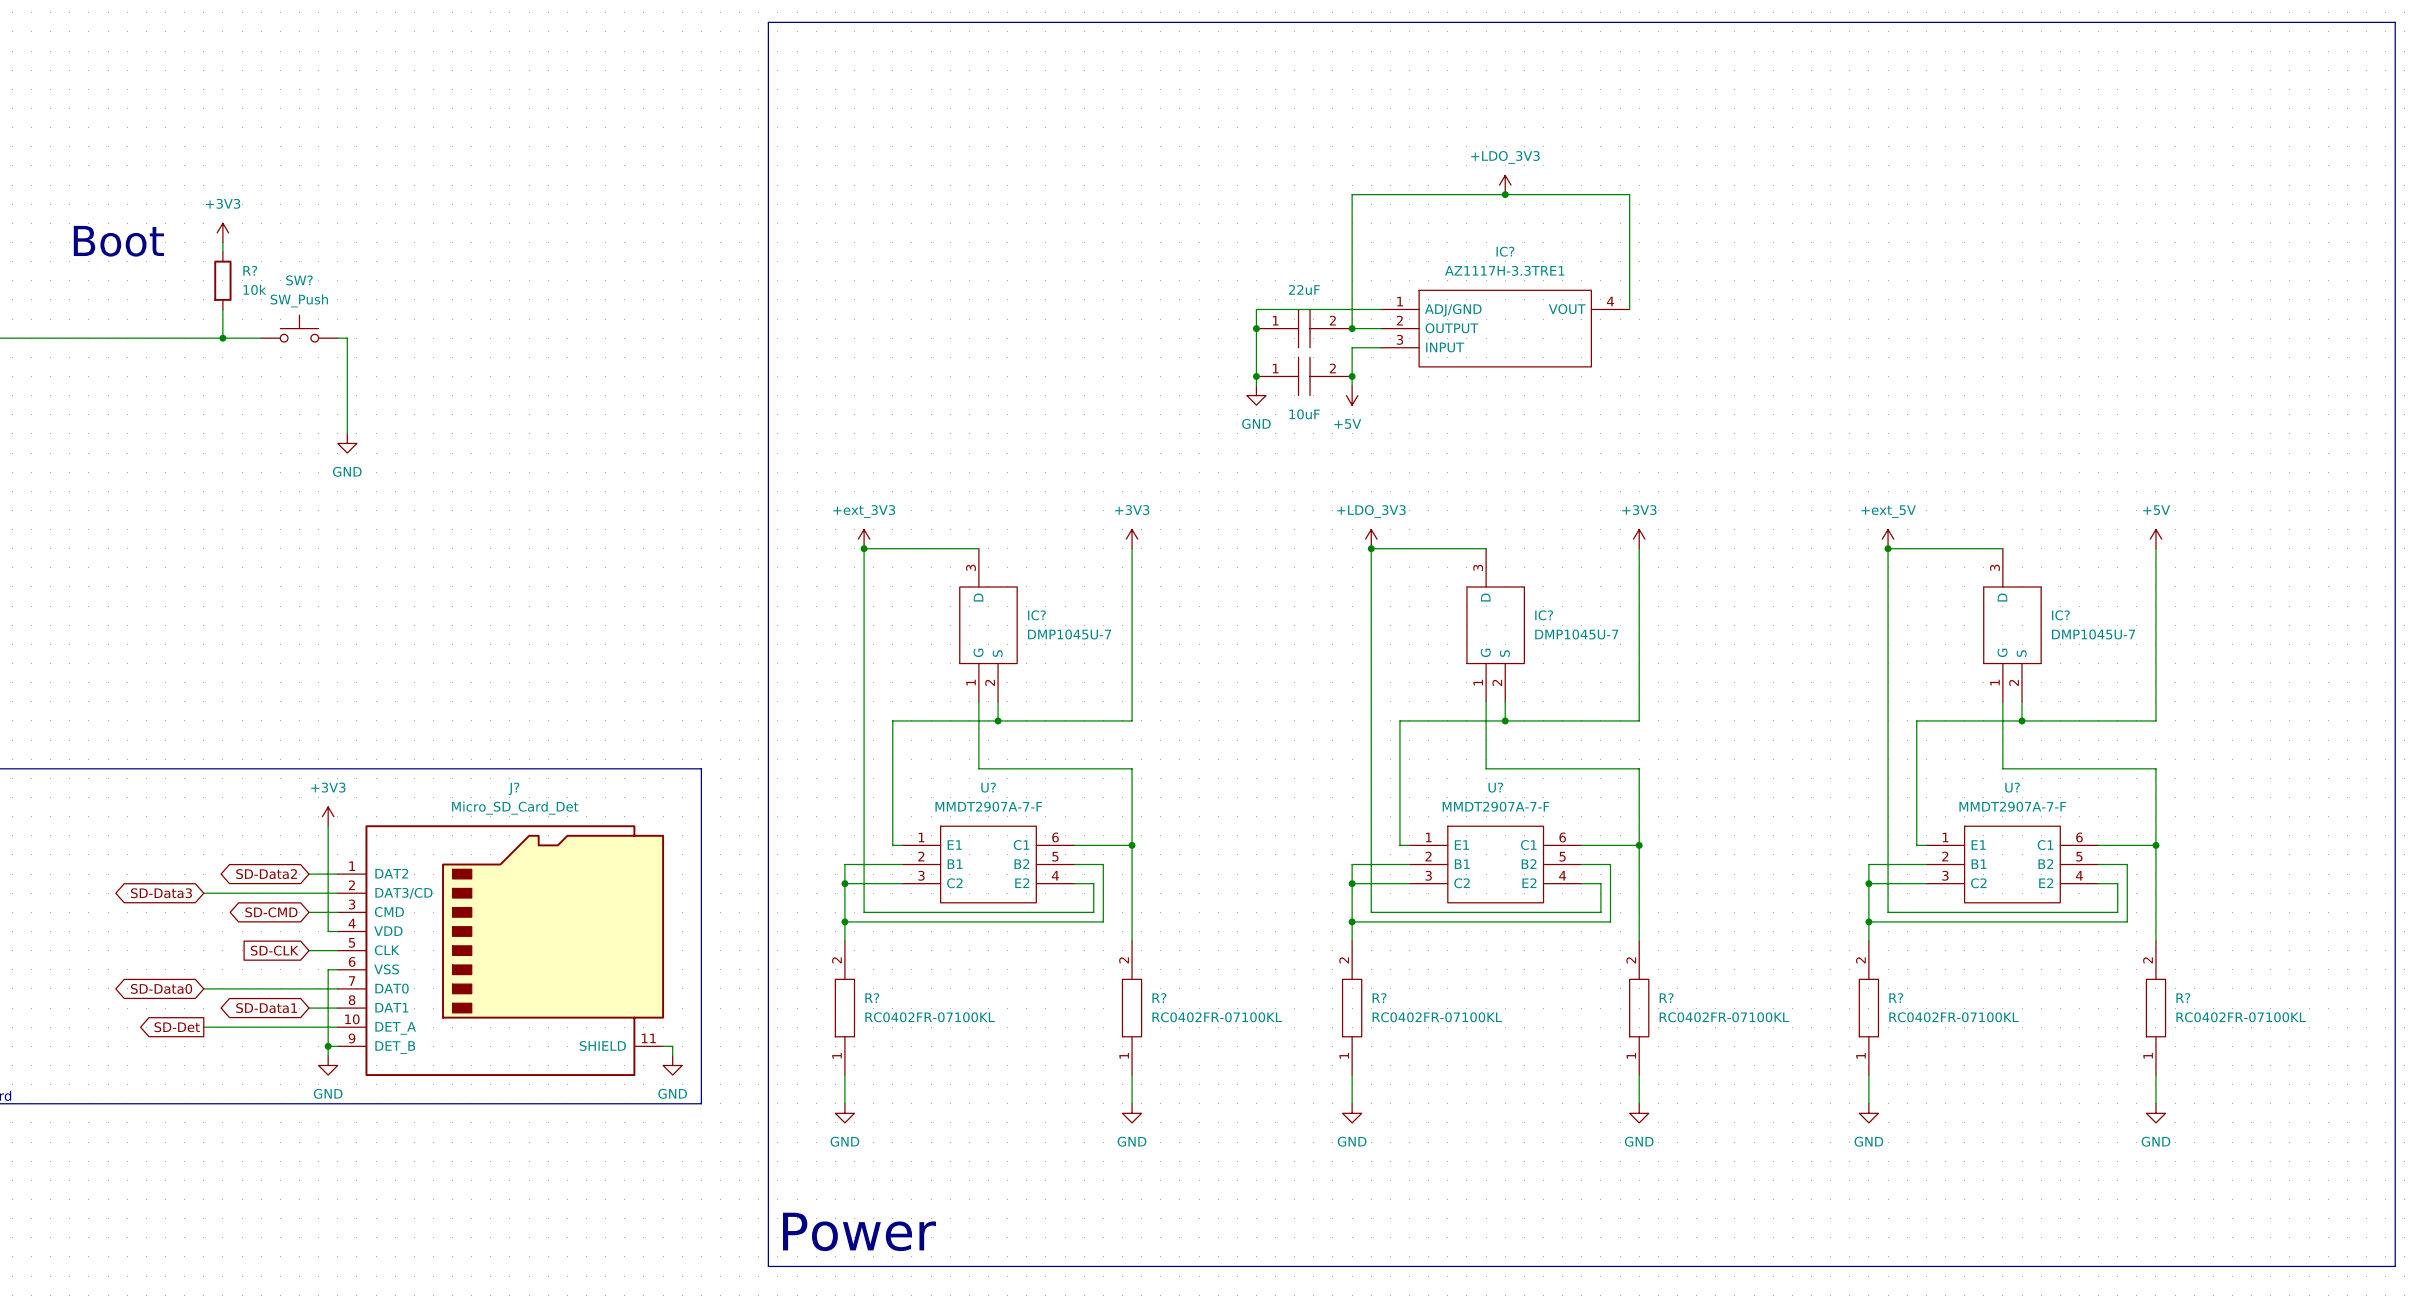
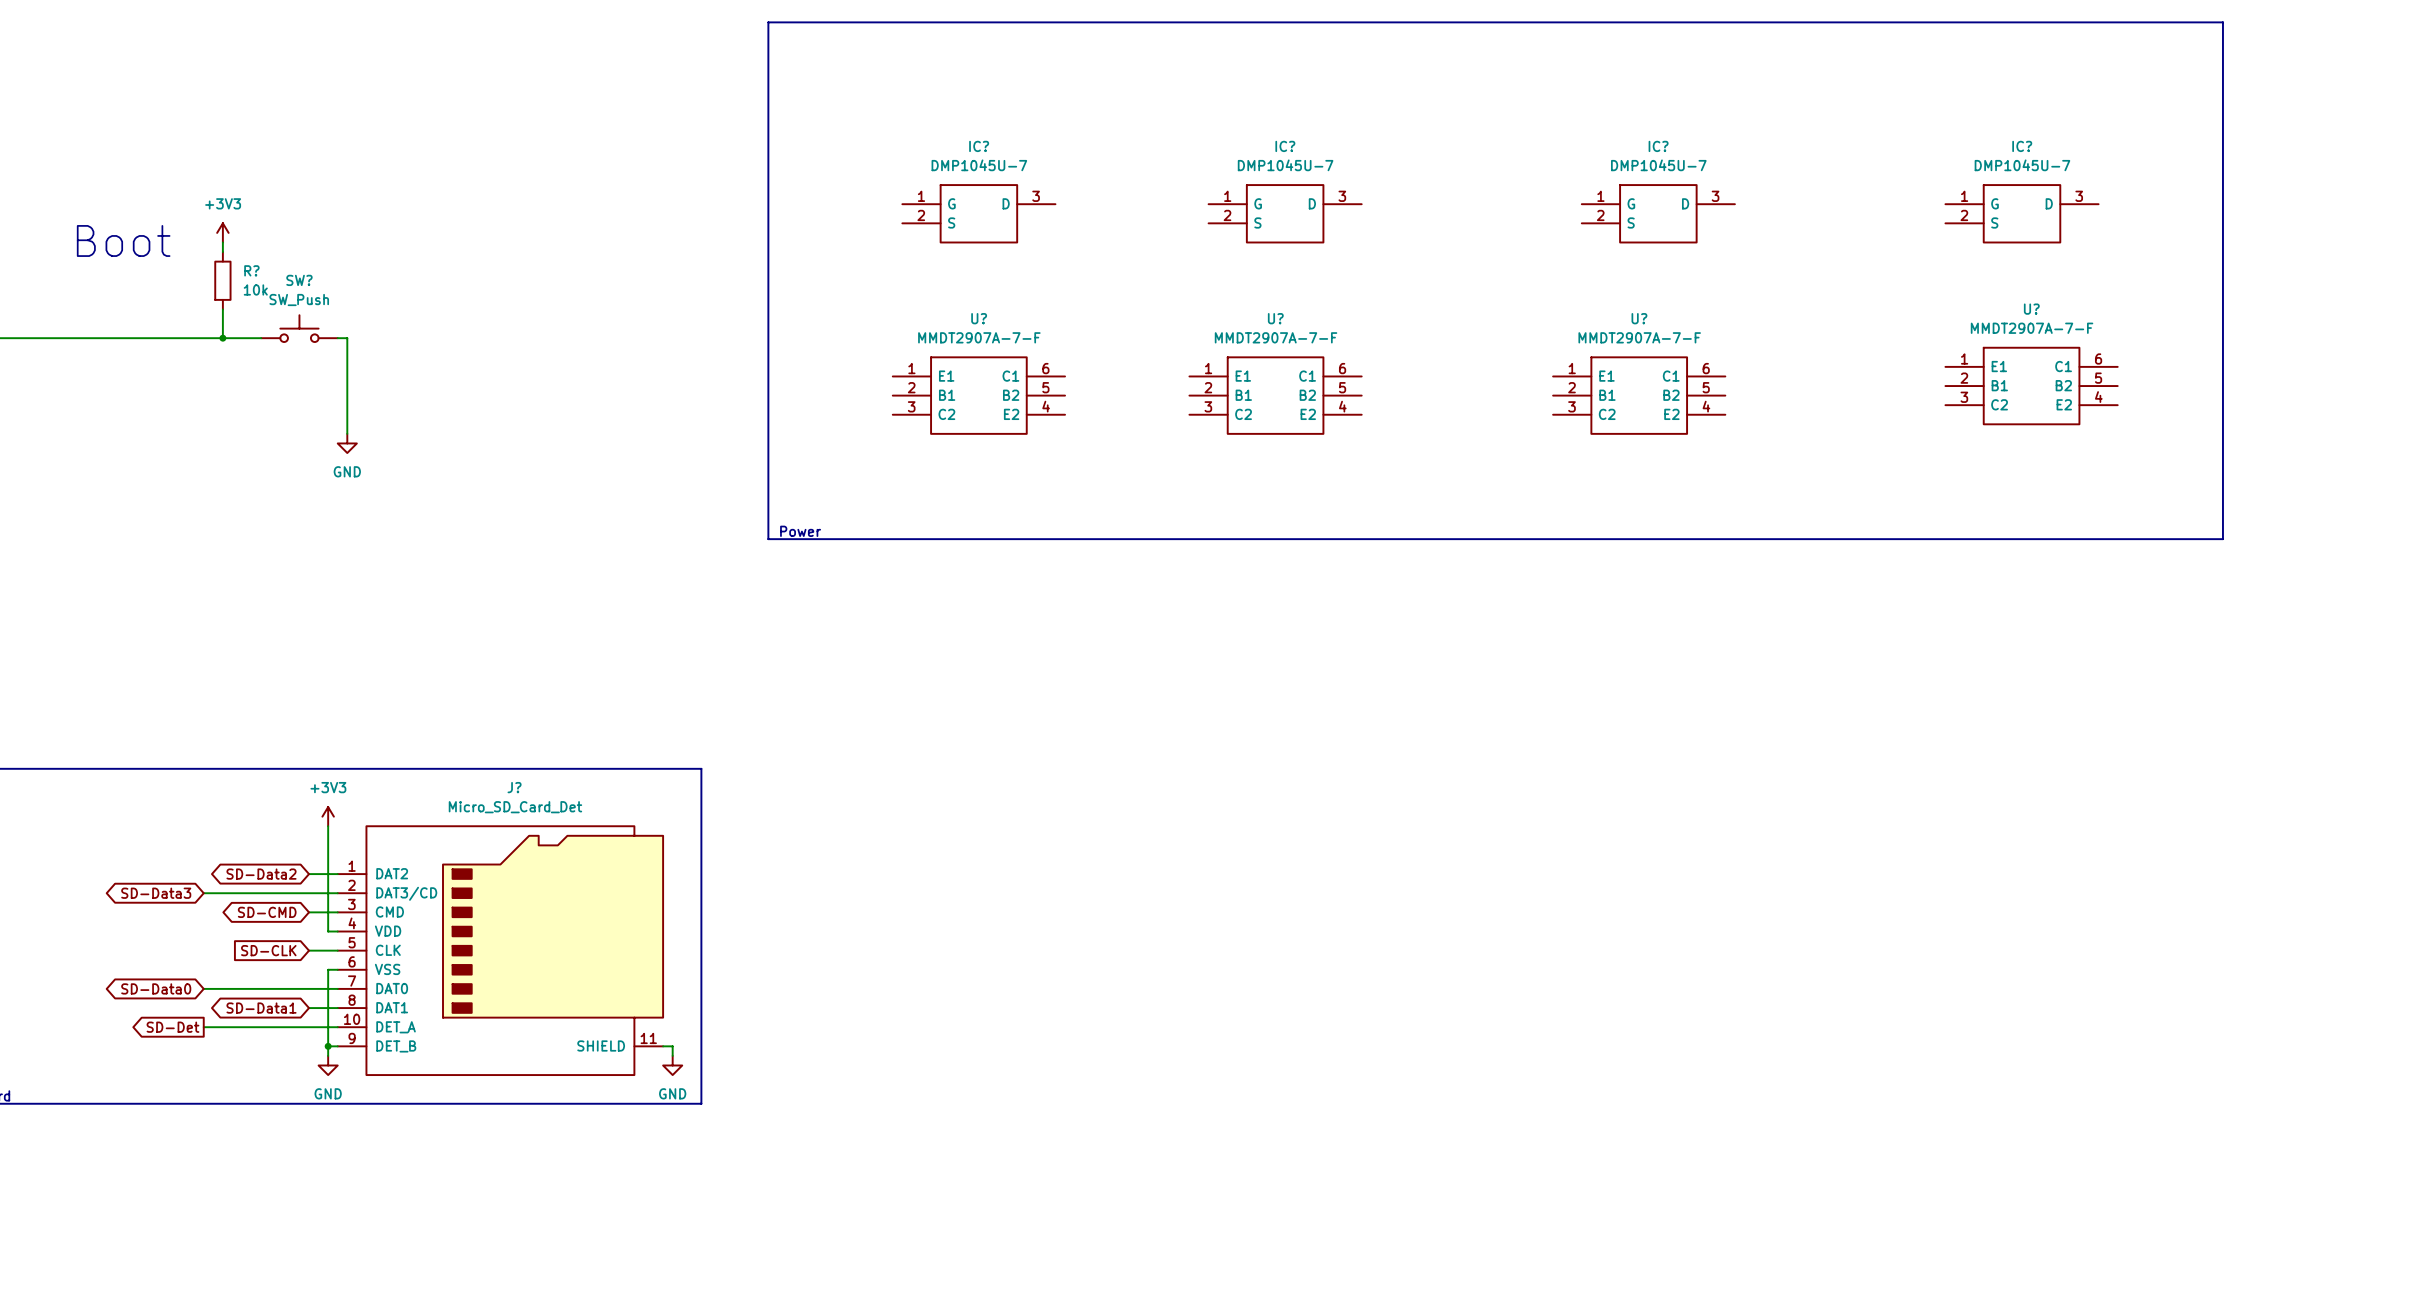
line: (2222, 22) (2395, 22) (2395, 1266) (768, 1266) (768, 539) -> (2222, 22) (2222, 539) (768, 539)
power symbol: +LDO_3V3 (1505, 185) -> none
junction: (1505, 194) -> none
IC?: none -> DMP1045U-7 (978, 213)
IC?: none -> DMP1045U-7 (1285, 213)
IC?: none -> DMP1045U-7 (1658, 213)
IC?: none -> DMP1045U-7 (2022, 213)
wire: (1380, 309) (1256, 309) (1256, 386) -> none
wire: (1629, 309) (1629, 194) (1352, 194) (1352, 328) (1380, 328) -> none
junction: (1256, 328) -> none
part: 22uF (1304, 328) -> none
junction: (1352, 328) -> none
IC?: AZ1117H-3.3TRE1 (1505, 328) -> none
wire: (1380, 347) (1352, 347) (1352, 386) -> none
junction: (1256, 376) -> none
part: 10uF (1304, 376) -> none
junction: (1352, 376) -> none
U?: none -> MMDT2907A-7-F (2031, 386)
U?: none -> MMDT2907A-7-F (978, 395)
power symbol: GND (1256, 395) -> none
U?: none -> MMDT2907A-7-F (1275, 395)
power symbol: +5V (1352, 395) -> none
U?: none -> MMDT2907A-7-F (1639, 395)
text: none -> Power (800, 531)
power symbol: +ext_3V3 (864, 539) -> none
power symbol: +3V3 (1132, 539) -> none
power symbol: +LDO_3V3 (1371, 539) -> none
power symbol: +3V3 (1639, 539) -> none
power symbol: +ext_5V (1888, 539) -> none
power symbol: +5V (2155, 539) -> none
junction: (864, 548) -> none
wire: (978, 548) (864, 548) (864, 912) (1093, 912) (1093, 883) (1074, 883) -> none
wire: (1132, 548) (1132, 720) (892, 720) (892, 845) (902, 845) -> none
junction: (1371, 548) -> none
wire: (1486, 548) (1371, 548) (1371, 912) (1600, 912) (1600, 883) (1581, 883) -> none
wire: (1639, 548) (1639, 720) (1399, 720) (1399, 845) (1409, 845) -> none
junction: (1888, 548) -> none
wire: (2002, 548) (1888, 548) (1888, 912) (2117, 912) (2117, 883) (2098, 883) -> none
wire: (2155, 548) (2155, 720) (1916, 720) (1916, 845) (1926, 845) -> none
IC?: DMP1045U-7 (988, 625) -> none
IC?: DMP1045U-7 (1495, 625) -> none
IC?: DMP1045U-7 (2012, 625) -> none
wire: (978, 701) (978, 768) (1132, 768) (1132, 941) -> none
wire: (998, 701) (998, 720) -> none
wire: (1486, 701) (1486, 768) (1639, 768) (1639, 941) -> none
wire: (1505, 701) (1505, 720) -> none
wire: (2002, 701) (2002, 768) (2155, 768) (2155, 941) -> none
wire: (2022, 701) (2022, 720) -> none
junction: (998, 720) -> none
junction: (1505, 720) -> none
junction: (2022, 720) -> none
wire: (1074, 845) (1132, 845) -> none
junction: (1132, 845) -> none
wire: (1581, 845) (1639, 845) -> none
junction: (1639, 845) -> none
wire: (2098, 845) (2155, 845) -> none
junction: (2155, 845) -> none
wire: (902, 864) (844, 864) (844, 941) -> none
U?: MMDT2907A-7-F (988, 864) -> none
wire: (1074, 864) (1103, 864) (1103, 921) (844, 921) -> none
wire: (1409, 864) (1352, 864) (1352, 941) -> none
U?: MMDT2907A-7-F (1495, 864) -> none
wire: (1581, 864) (1610, 864) (1610, 921) (1352, 921) -> none
wire: (1926, 864) (1868, 864) (1868, 941) -> none
U?: MMDT2907A-7-F (2012, 864) -> none
wire: (2098, 864) (2127, 864) (2127, 921) (1868, 921) -> none
wire: (844, 883) (902, 883) -> none
junction: (844, 883) -> none
wire: (1352, 883) (1409, 883) -> none
junction: (1352, 883) -> none
wire: (1868, 883) (1926, 883) -> none
junction: (1868, 883) -> none
junction: (844, 921) -> none
junction: (1352, 921) -> none
junction: (1868, 921) -> none
R?: RC0402FR-07100KL (844, 1008) -> none
R?: RC0402FR-07100KL (1132, 1008) -> none
R?: RC0402FR-07100KL (1352, 1008) -> none
R?: RC0402FR-07100KL (1639, 1008) -> none
R?: RC0402FR-07100KL (1868, 1008) -> none
R?: RC0402FR-07100KL (2155, 1008) -> none
wire: (844, 1075) (844, 1103) -> none
wire: (1132, 1075) (1132, 1103) -> none
wire: (1352, 1075) (1352, 1103) -> none
wire: (1639, 1075) (1639, 1103) -> none
wire: (1868, 1075) (1868, 1103) -> none
wire: (2155, 1075) (2155, 1103) -> none
power symbol: GND (844, 1113) -> none
power symbol: GND (1132, 1113) -> none
power symbol: GND (1352, 1113) -> none
power symbol: GND (1639, 1113) -> none
power symbol: GND (1868, 1113) -> none
power symbol: GND (2155, 1113) -> none
text: Power (859, 1231) -> none

